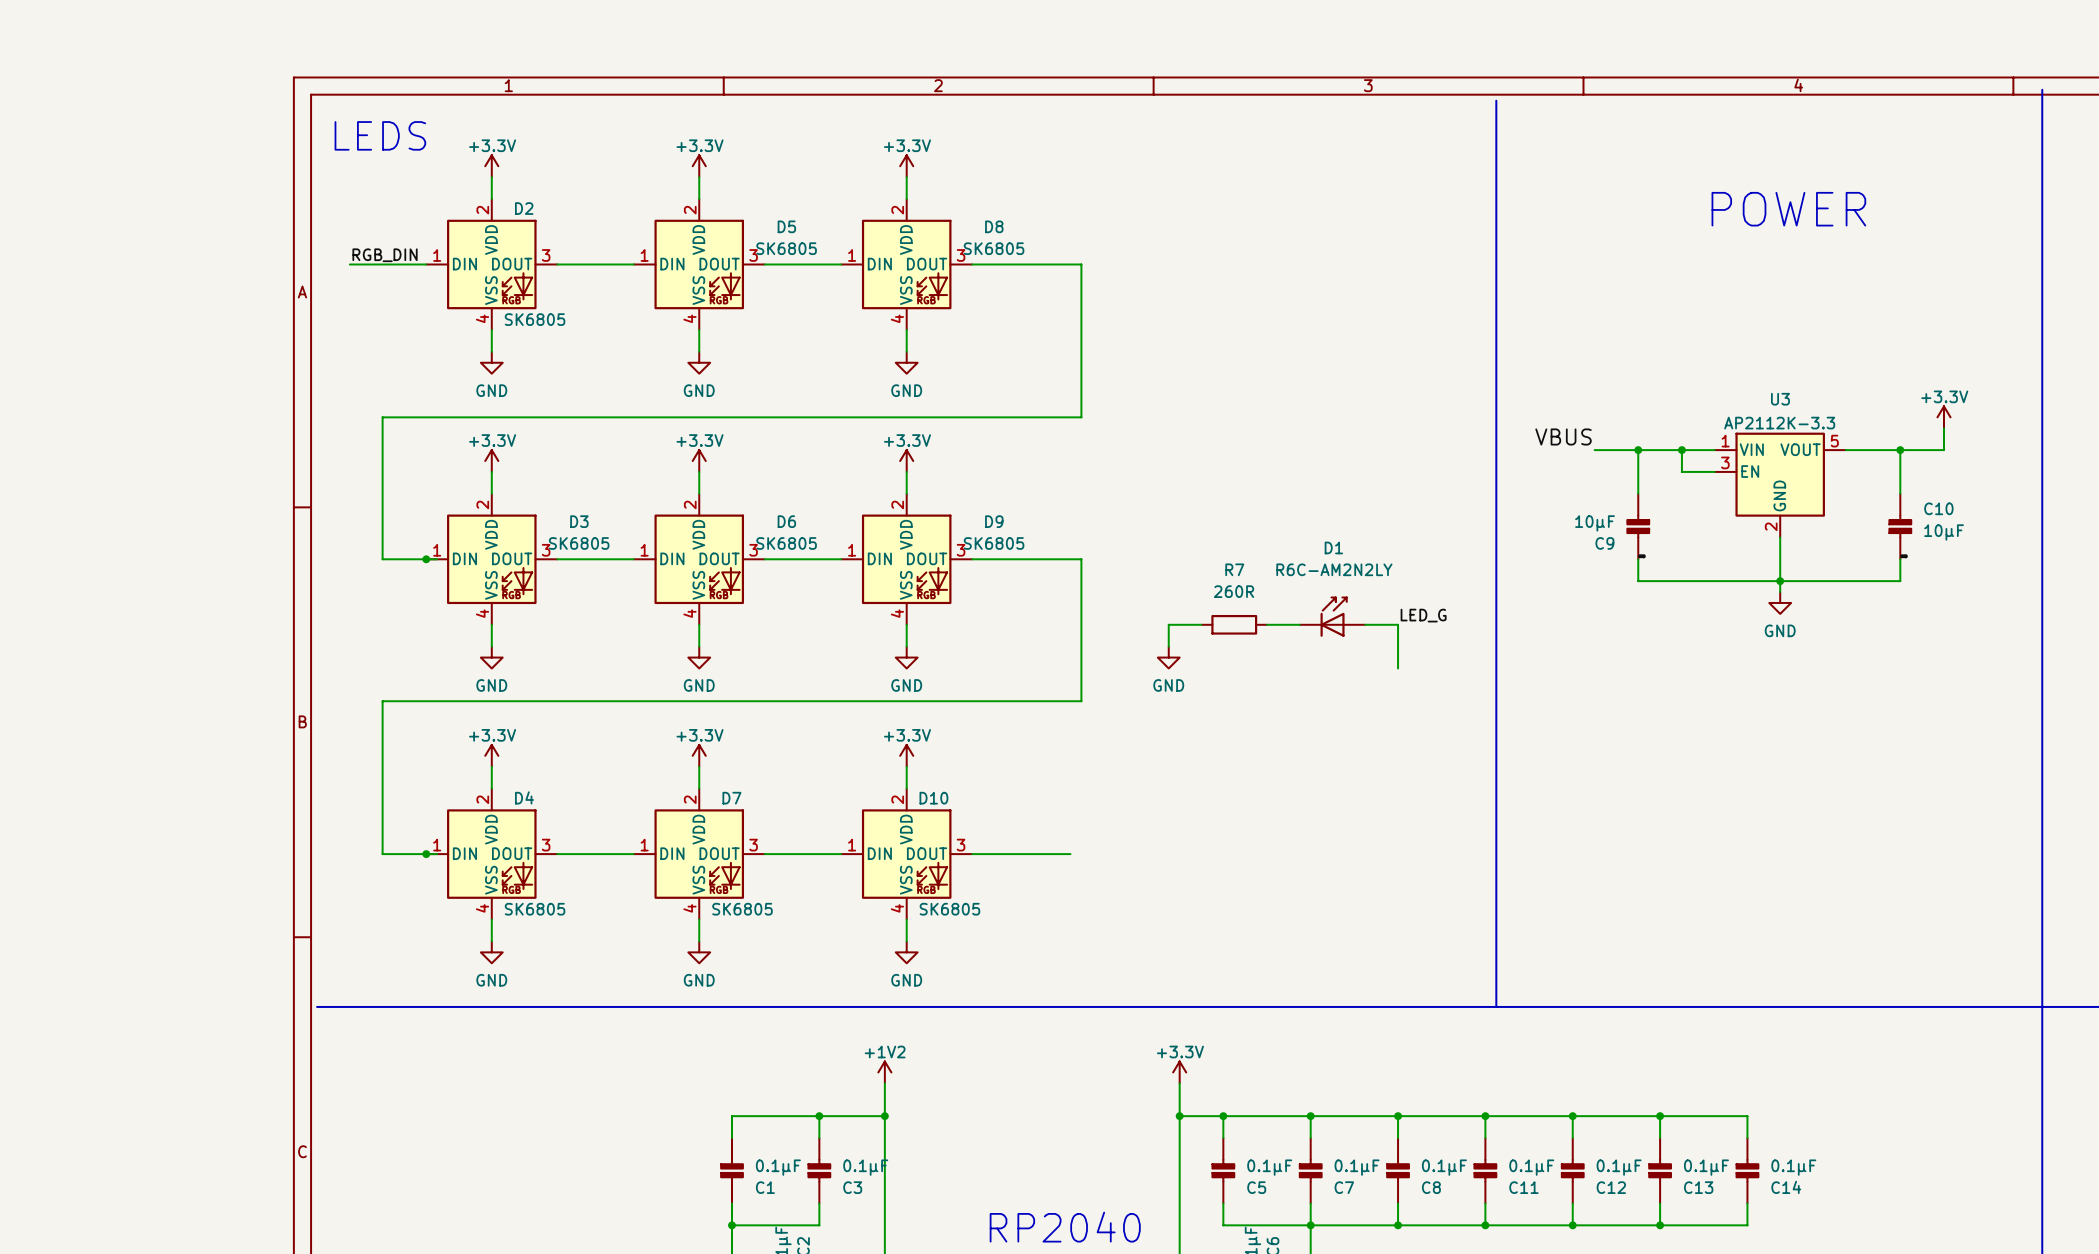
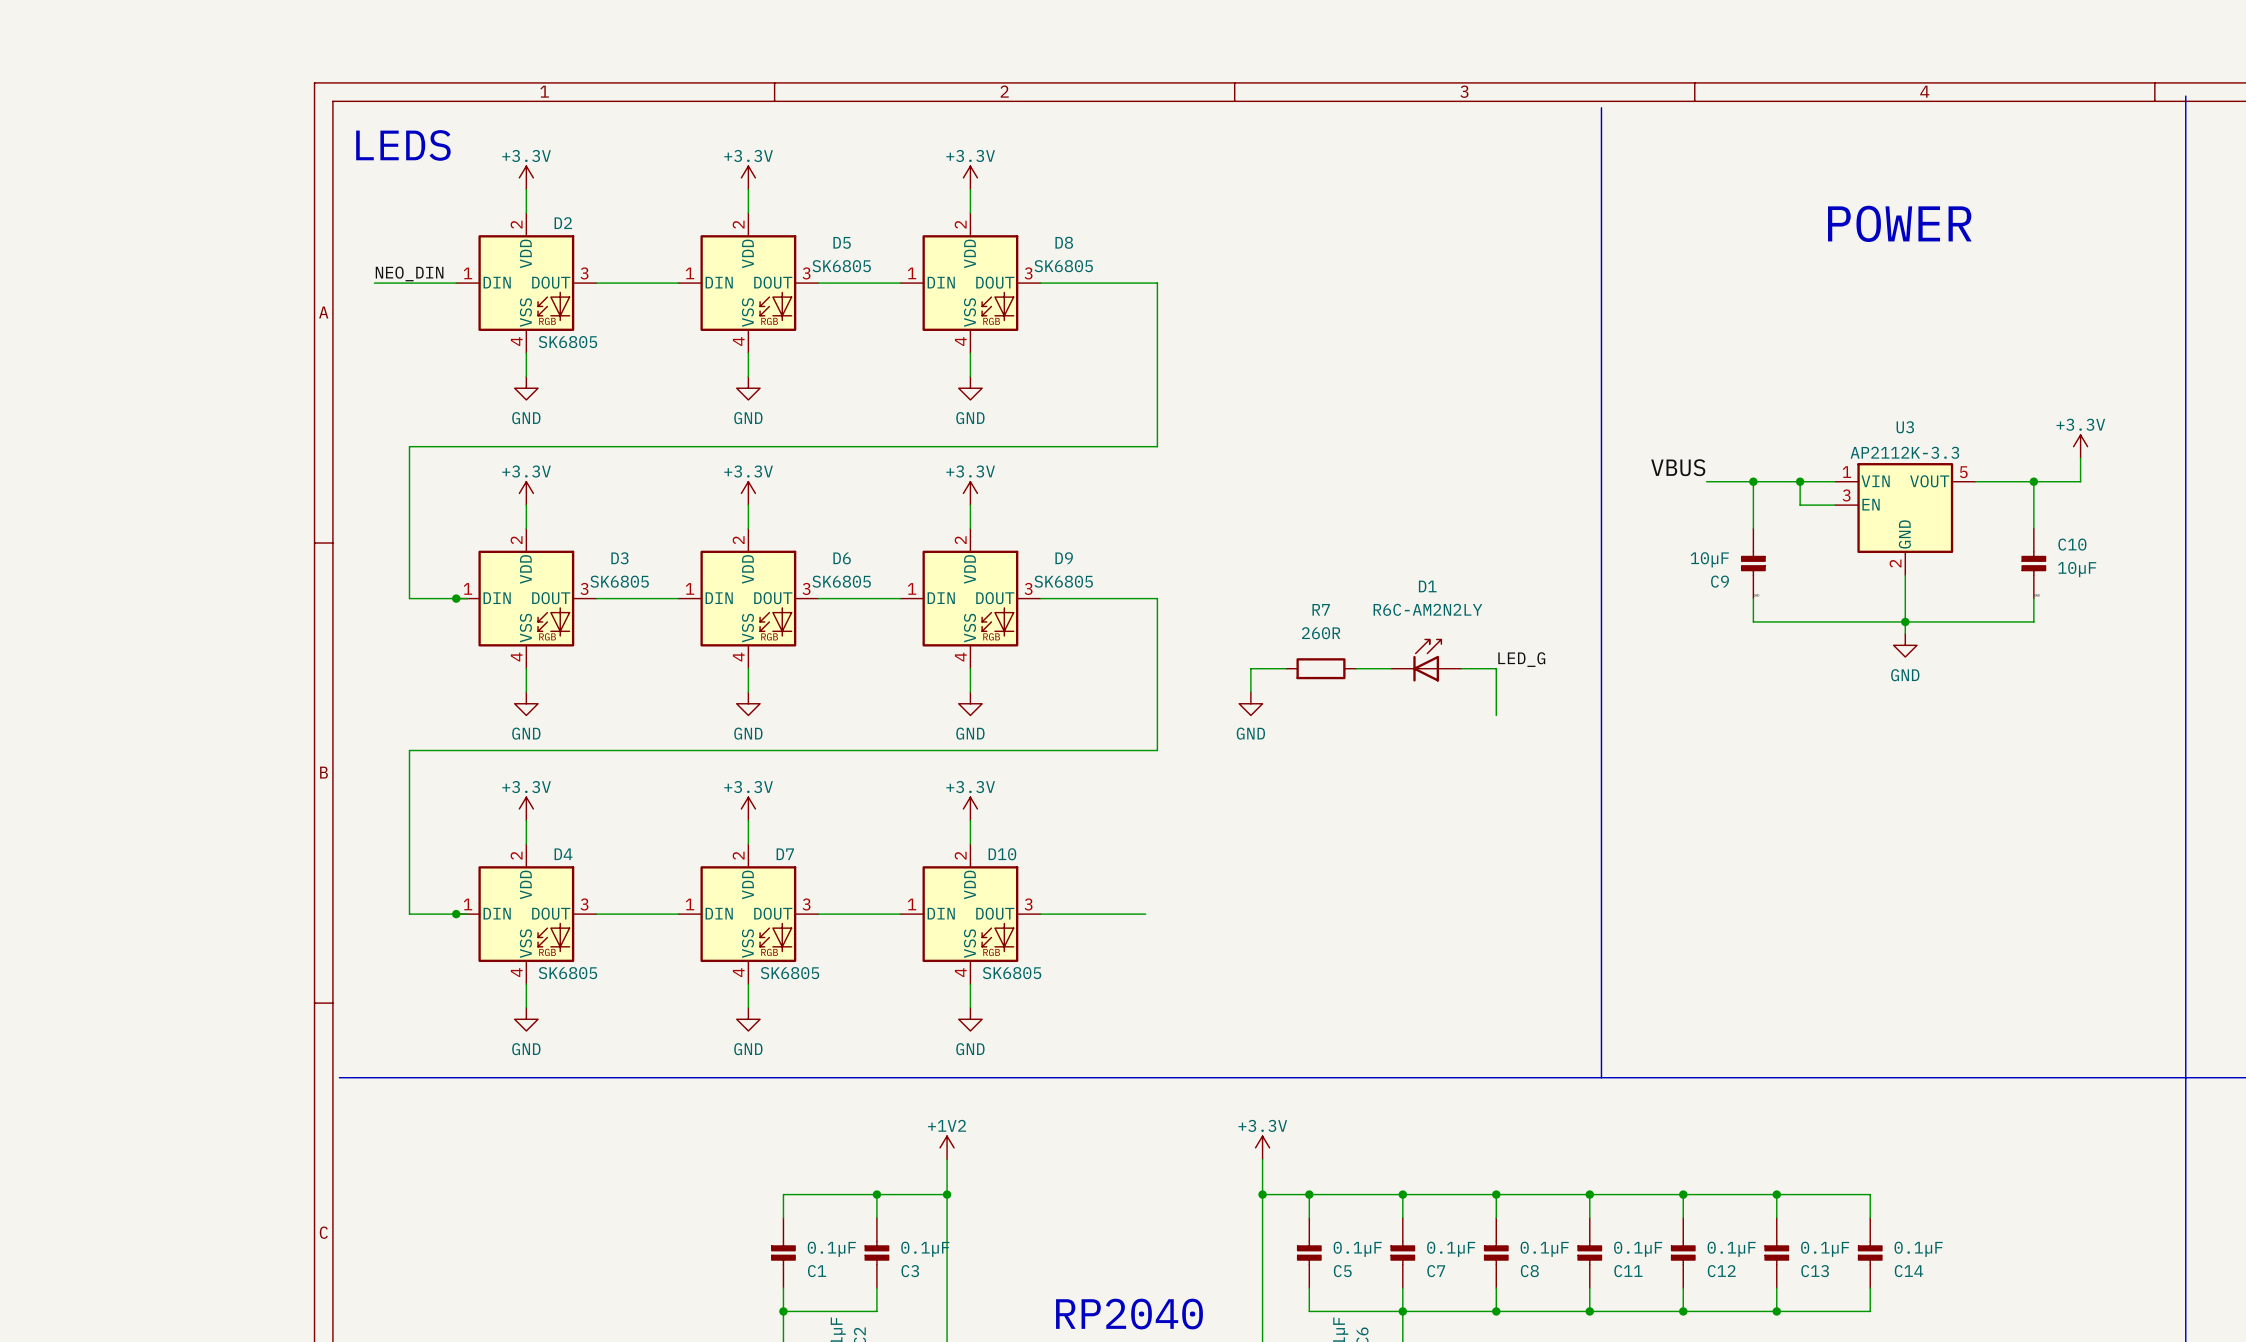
label: RGB_DIN (385, 255) -> NEO_DIN (409, 273)

